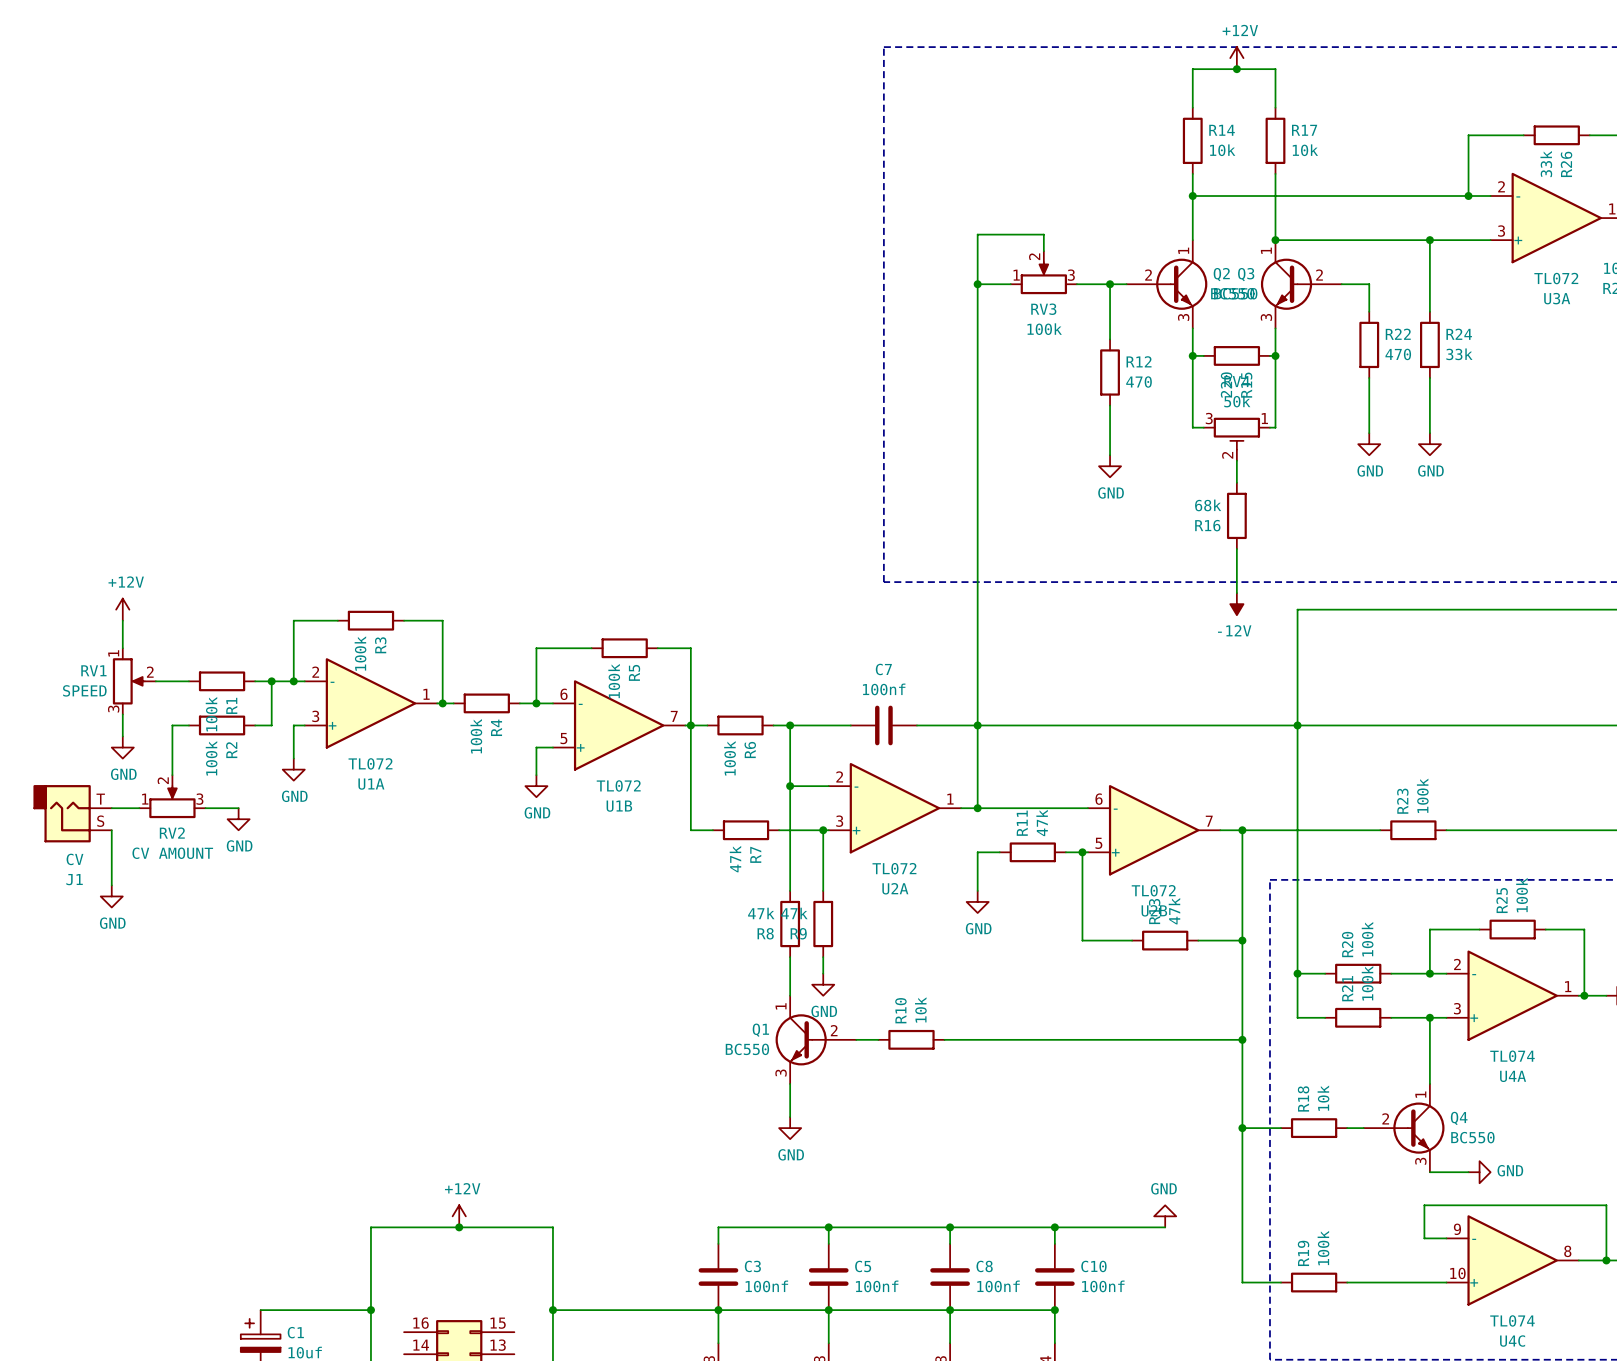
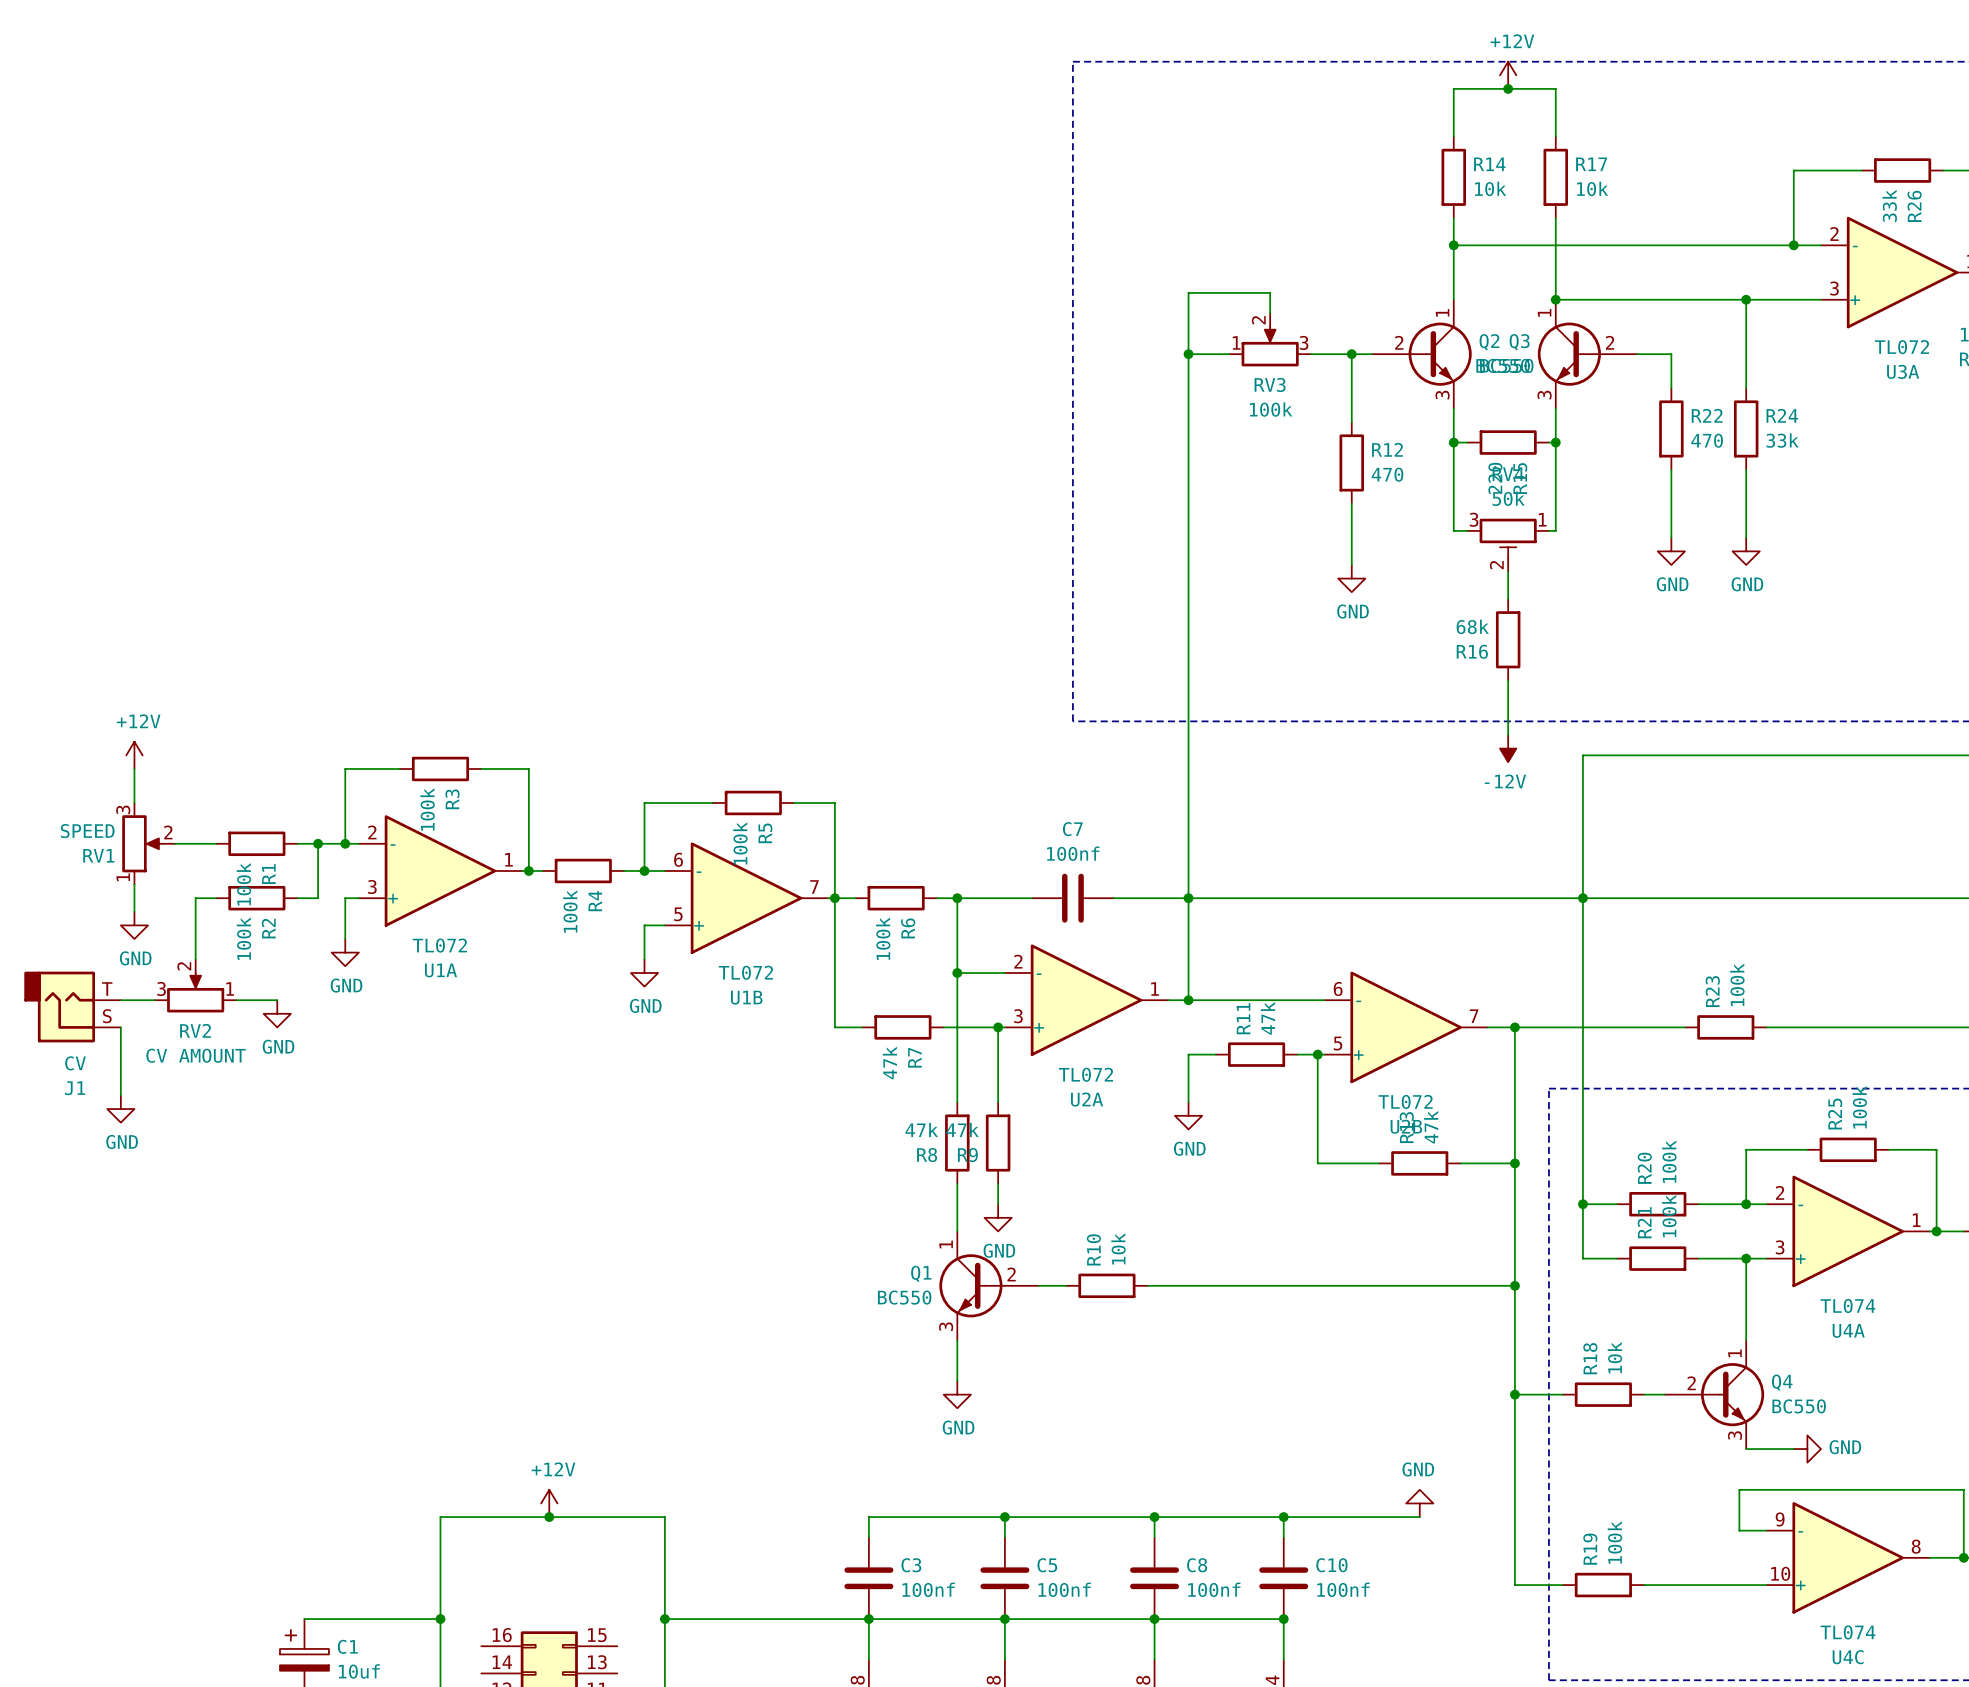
RV1 flip: as is (128, 681) -> up-down (141, 843)
RV2 flip: as is (172, 802) -> left-right (195, 992)

